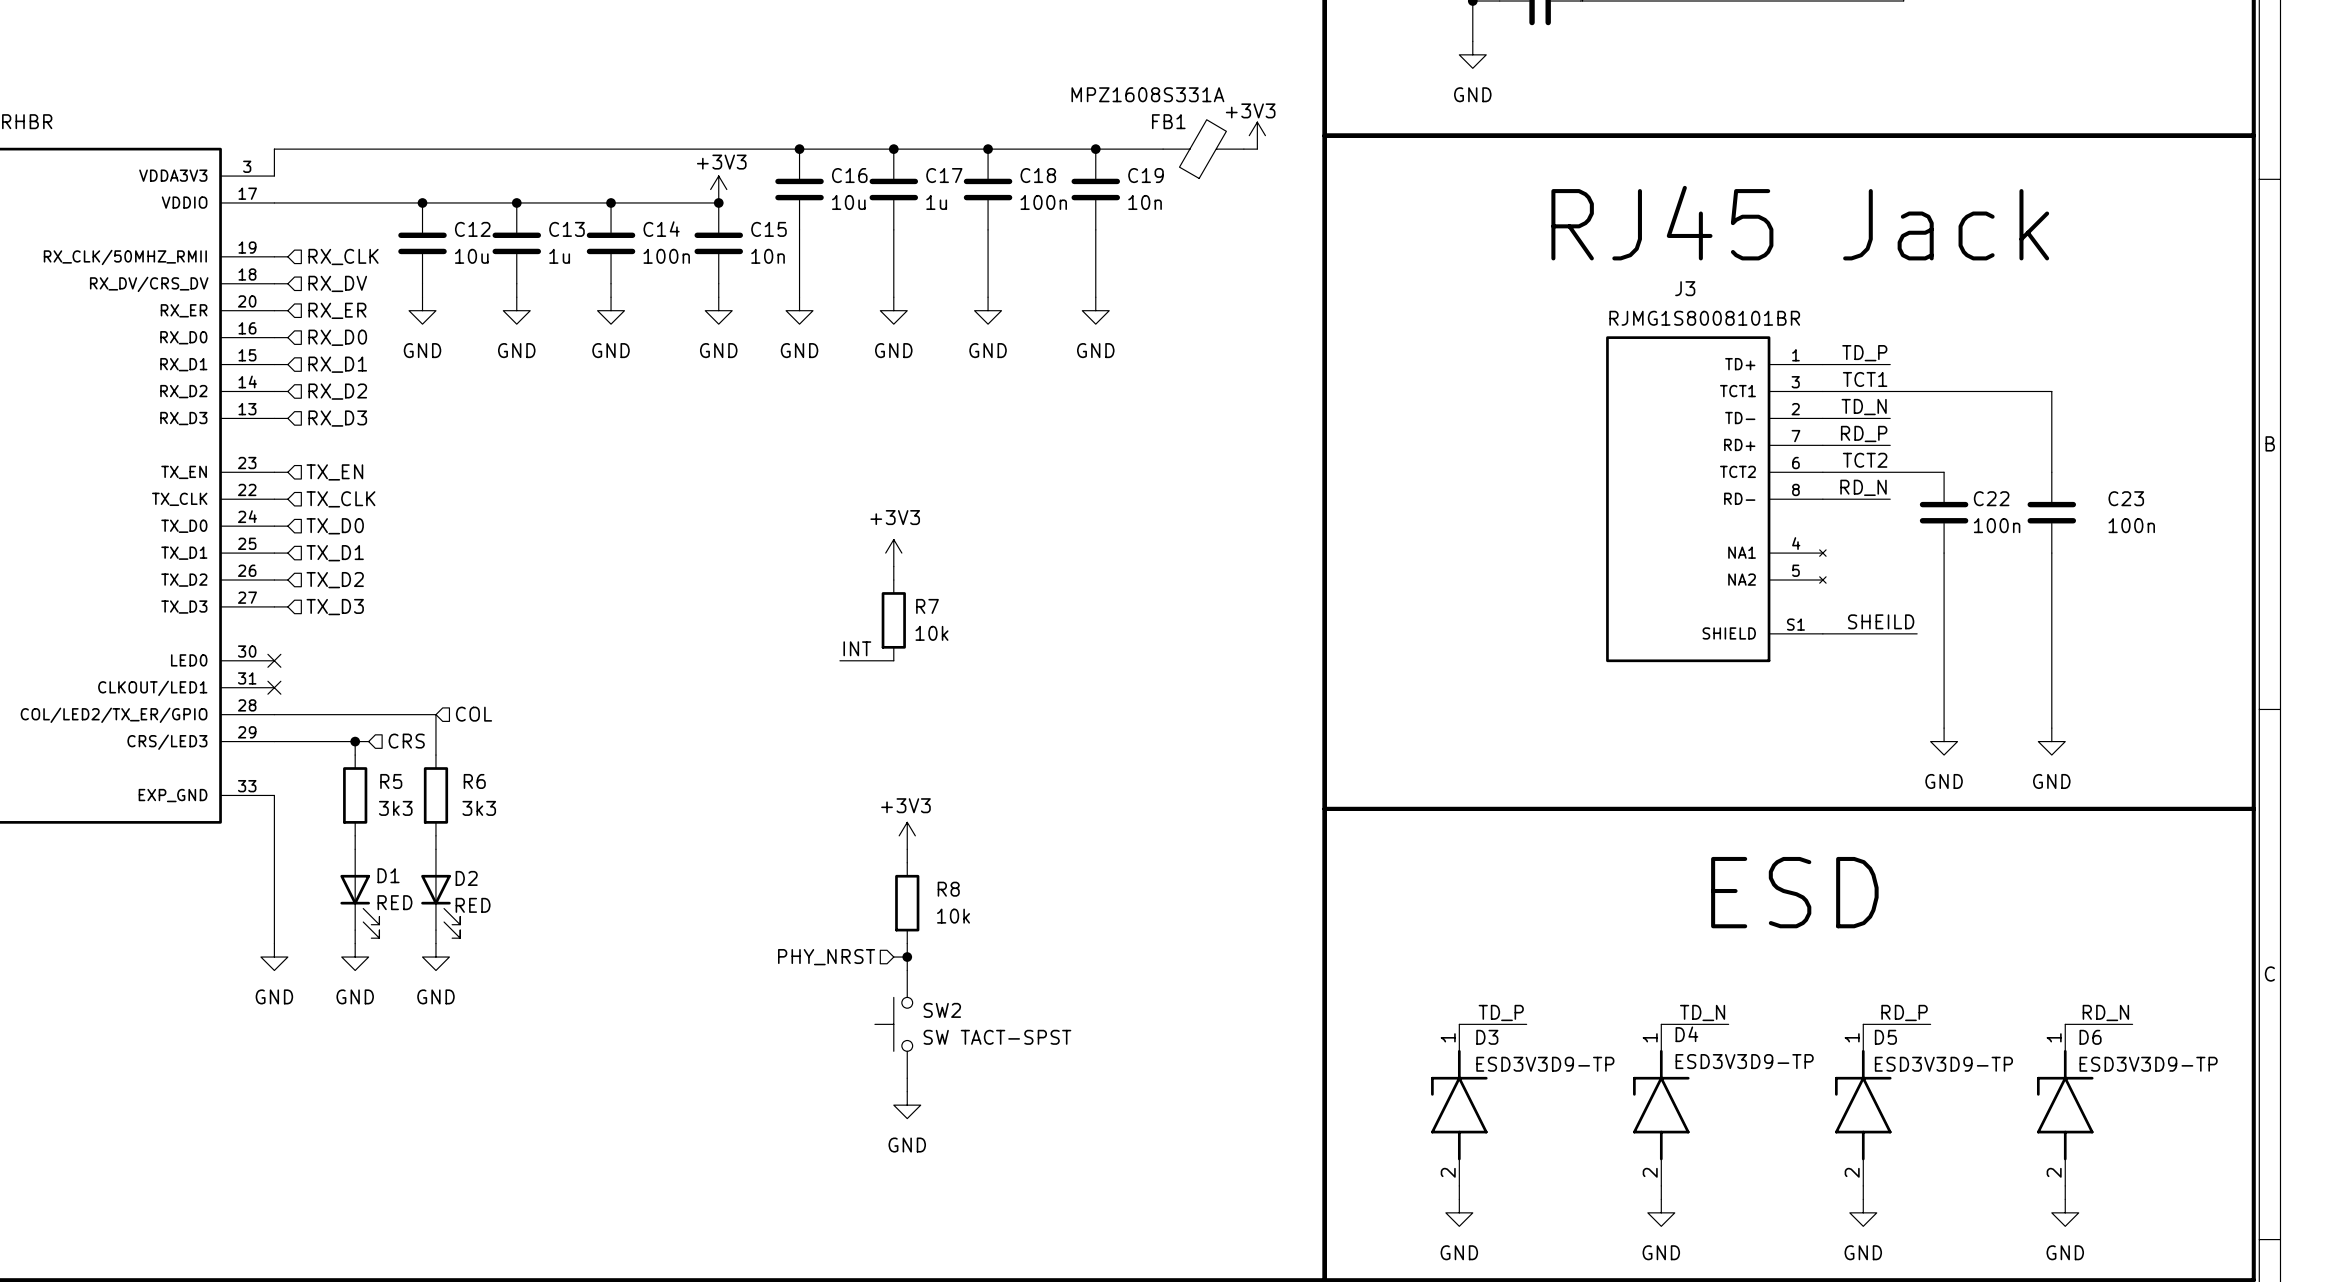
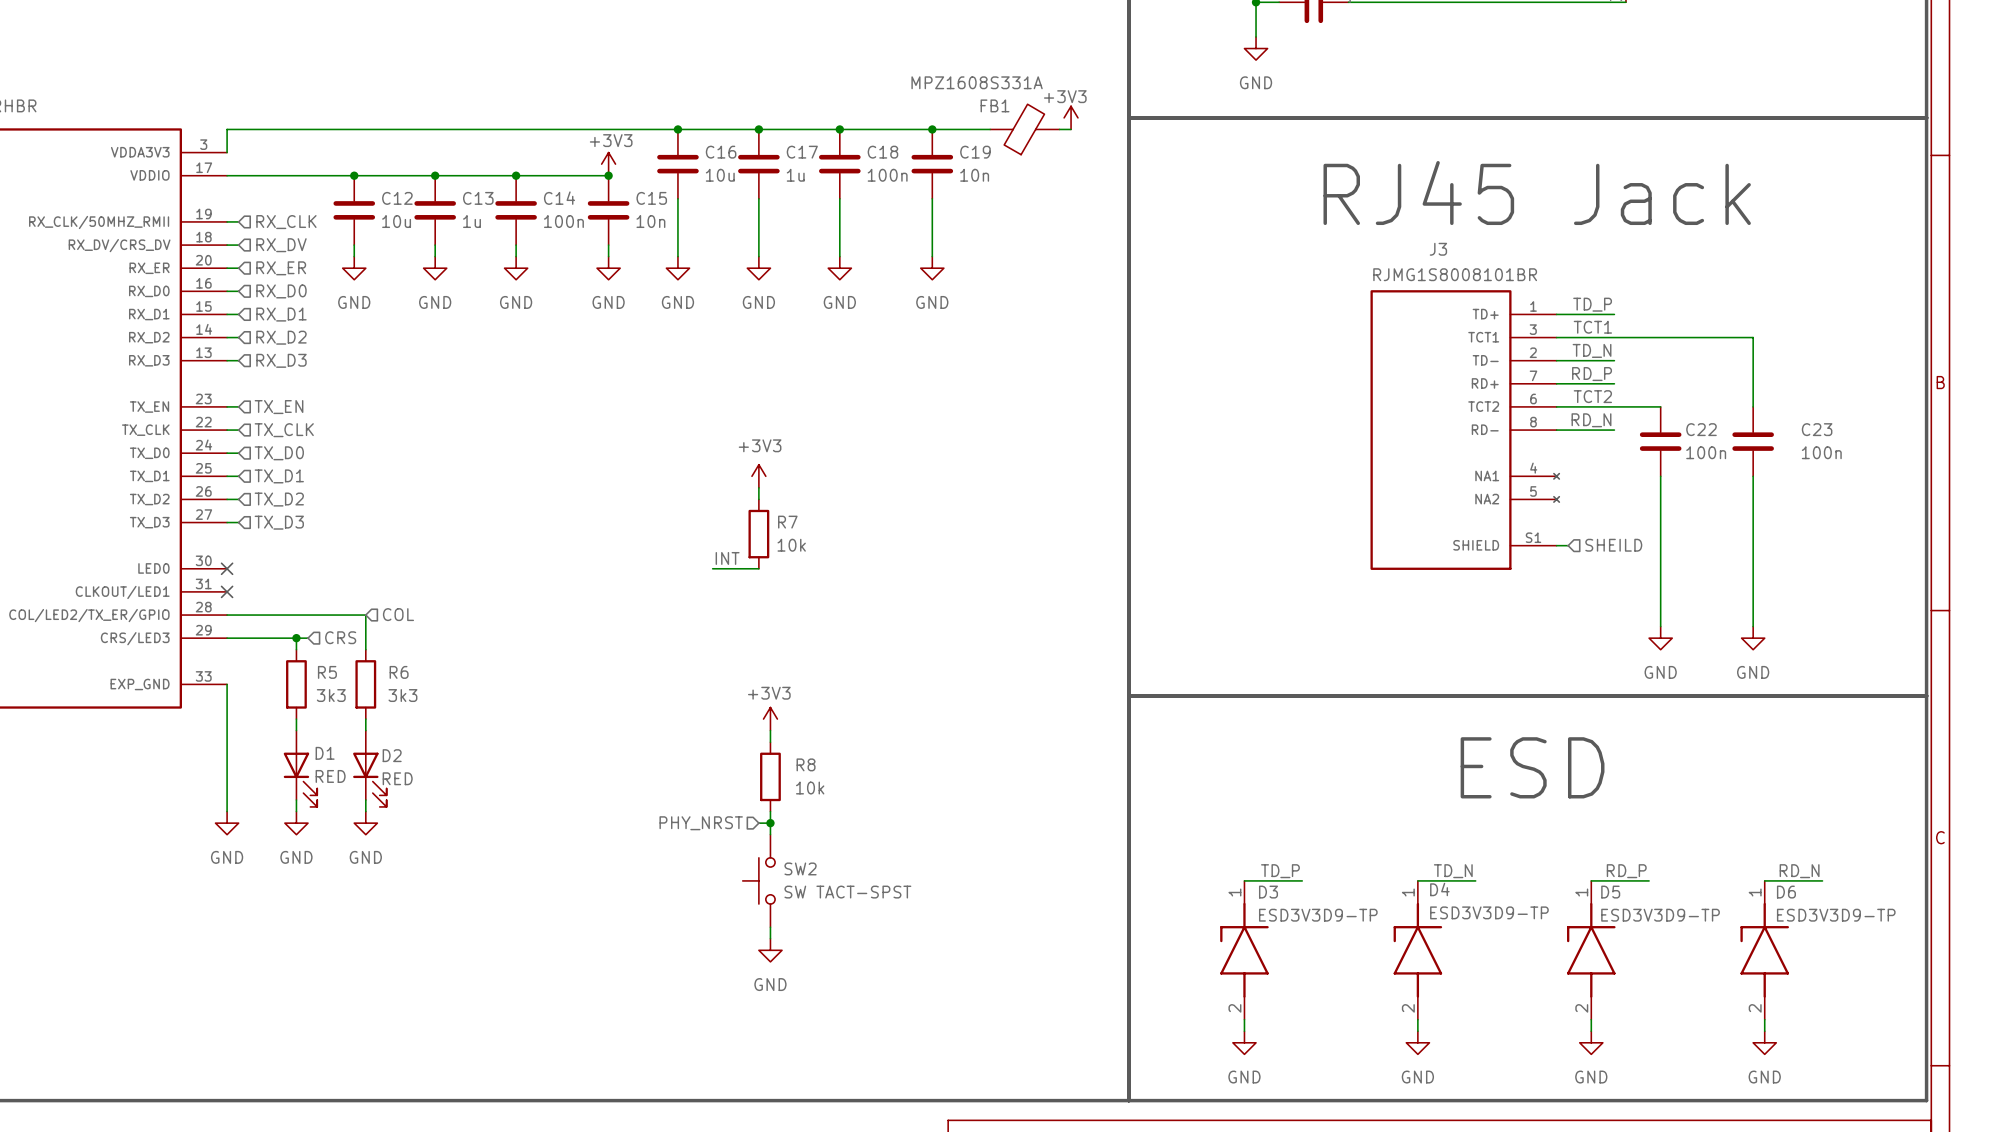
label: SHEILD (1881, 621) -> none
wire: (1836, 633) (1917, 633) -> none
hierarchical label: none -> SHEILD (1613, 545)

